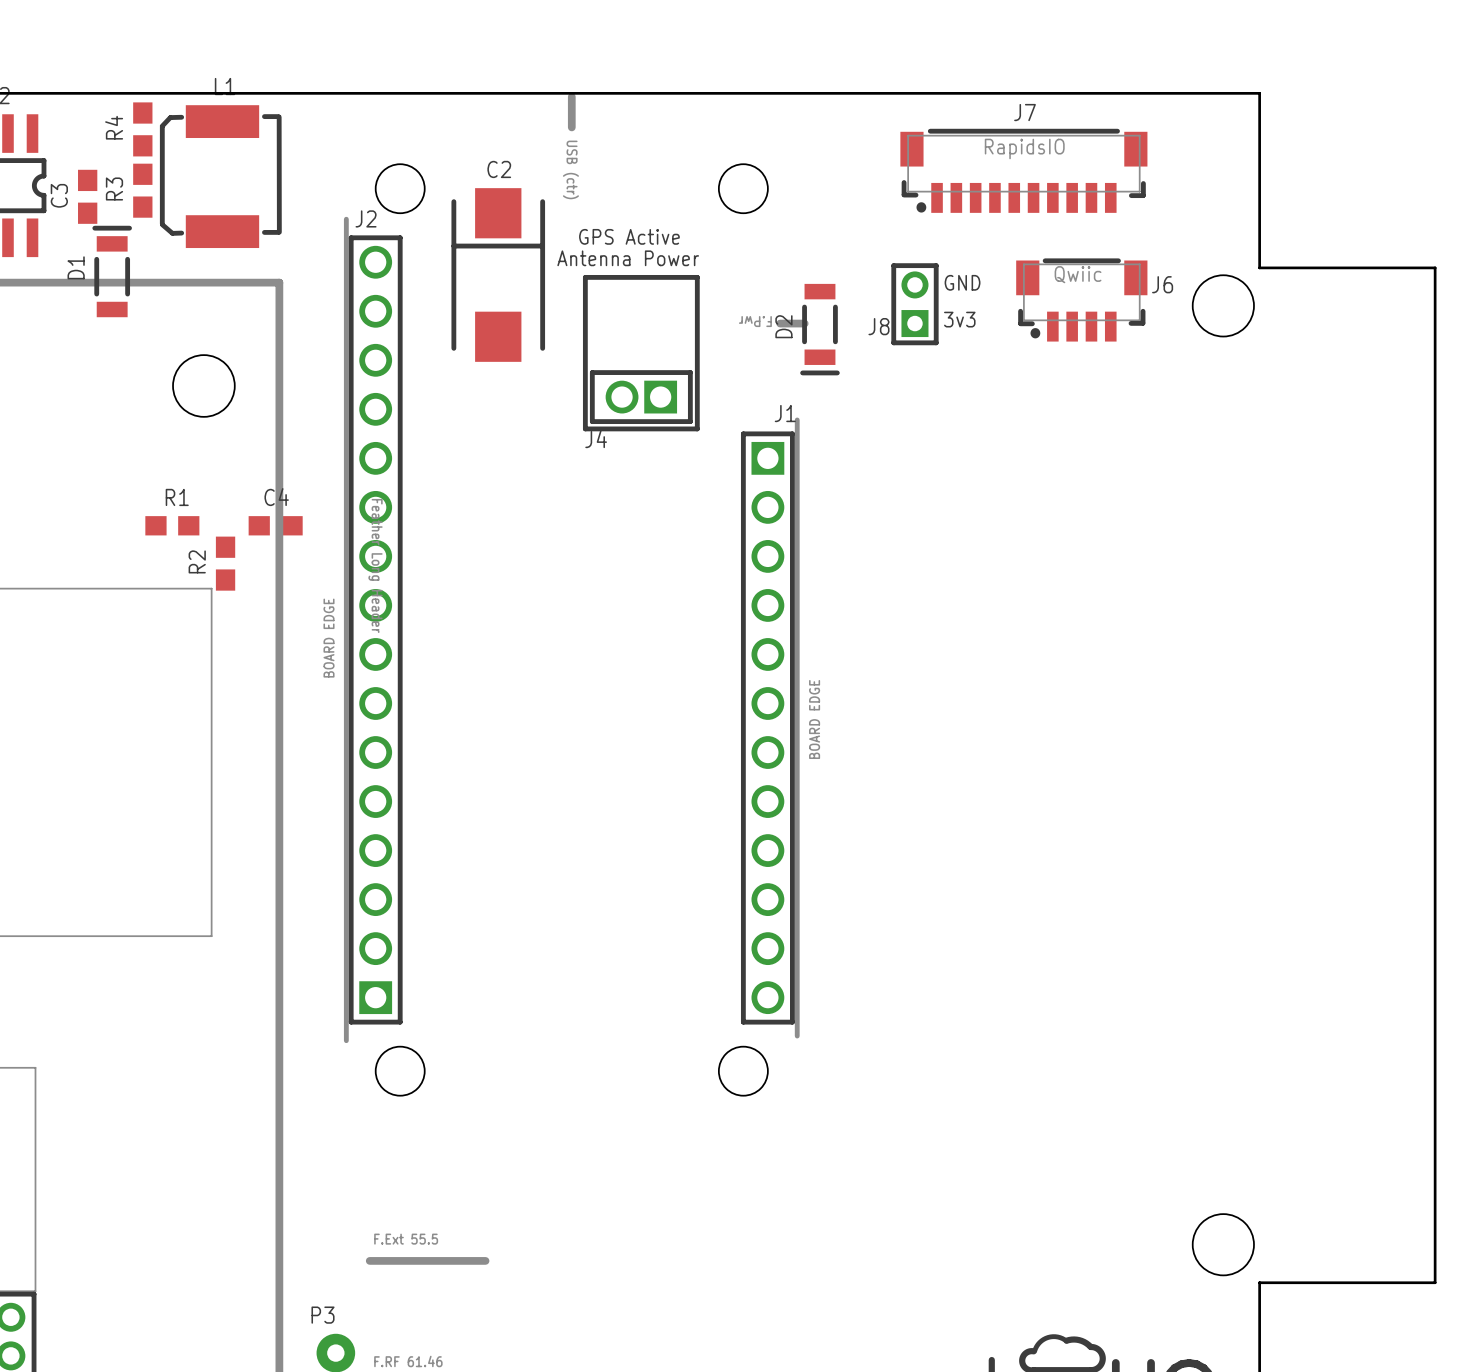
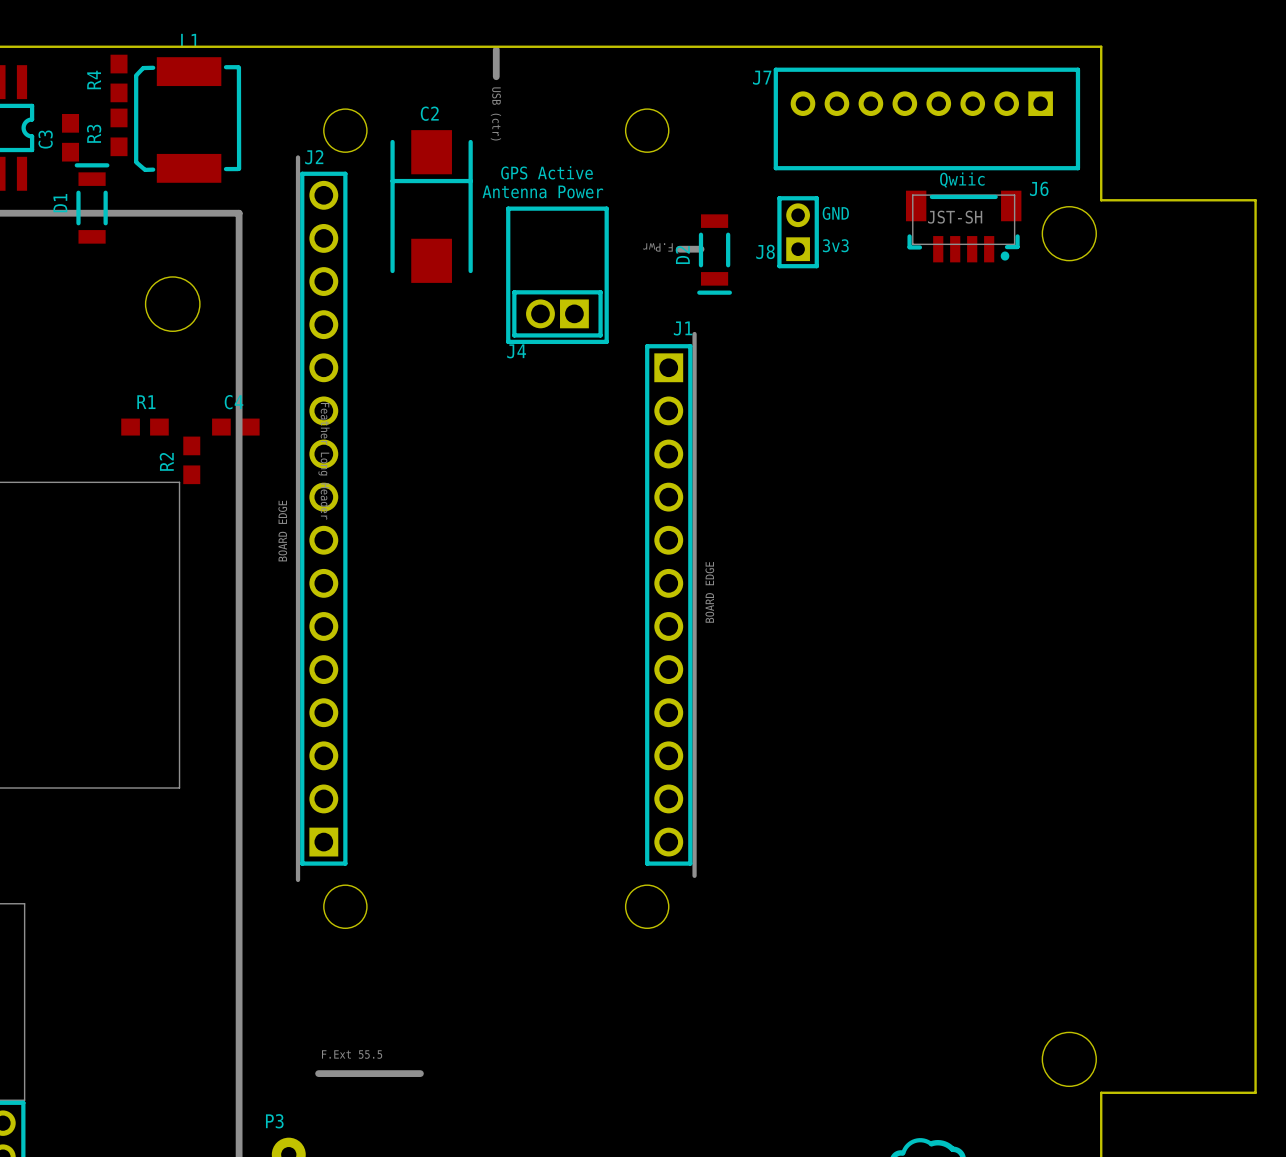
J7 name position: J7 (1025, 112) -> J7 (762, 77)
J7 footprint: [900, 128, 1148, 213] -> [773, 67, 1081, 171]
J6 footprint: [1016, 258, 1148, 342] -> [905, 190, 1022, 263]

